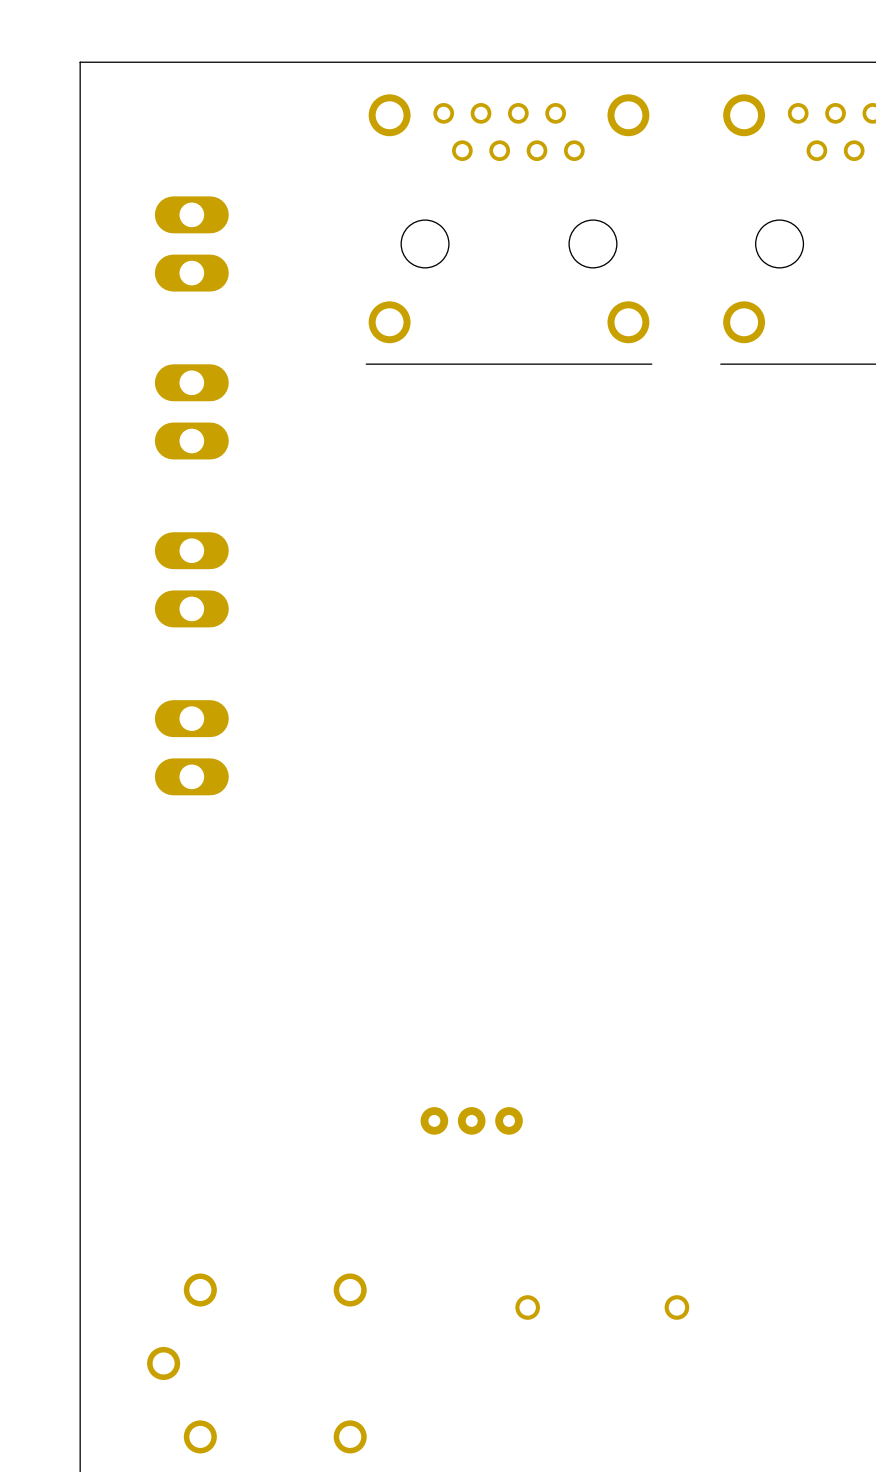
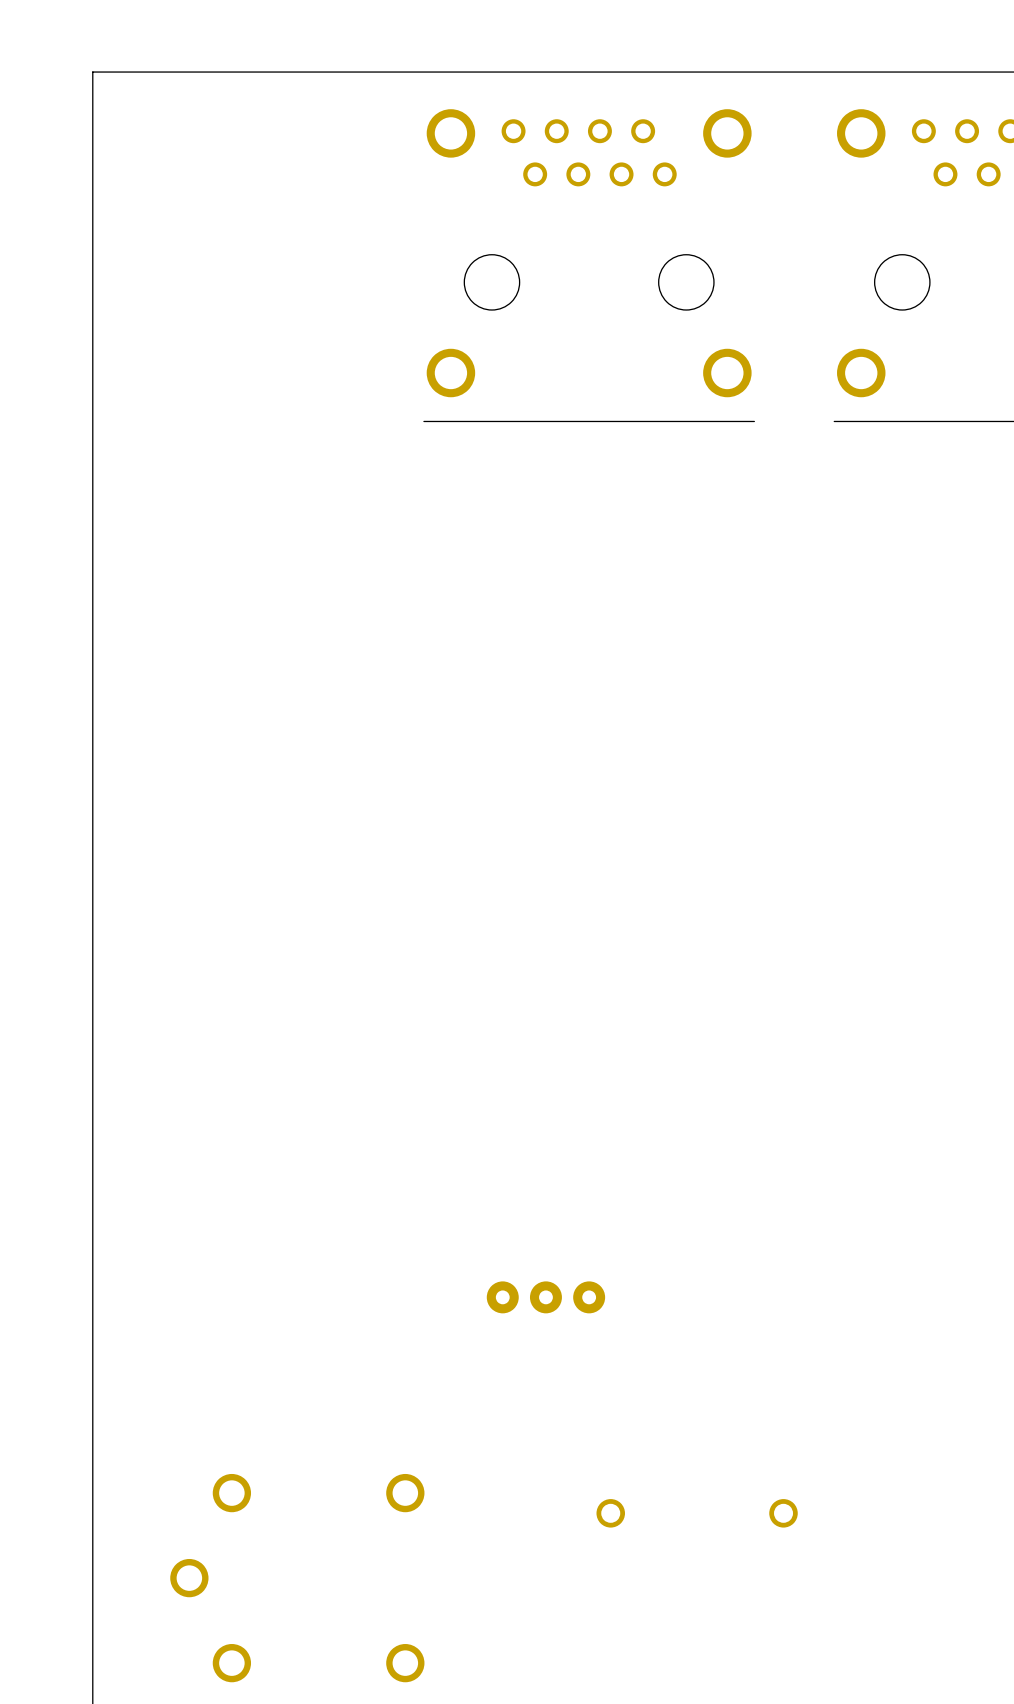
part: (191, 243) -> none
part: (191, 411) -> none
part: (191, 579) -> none
part: (191, 747) -> none

